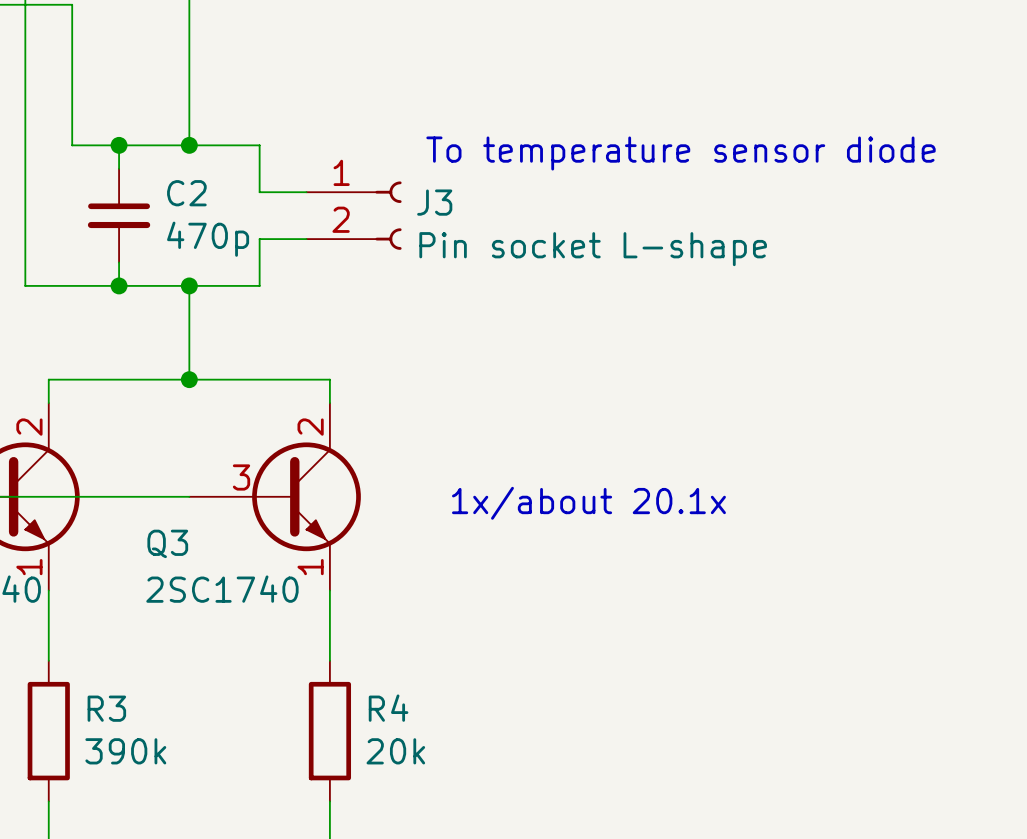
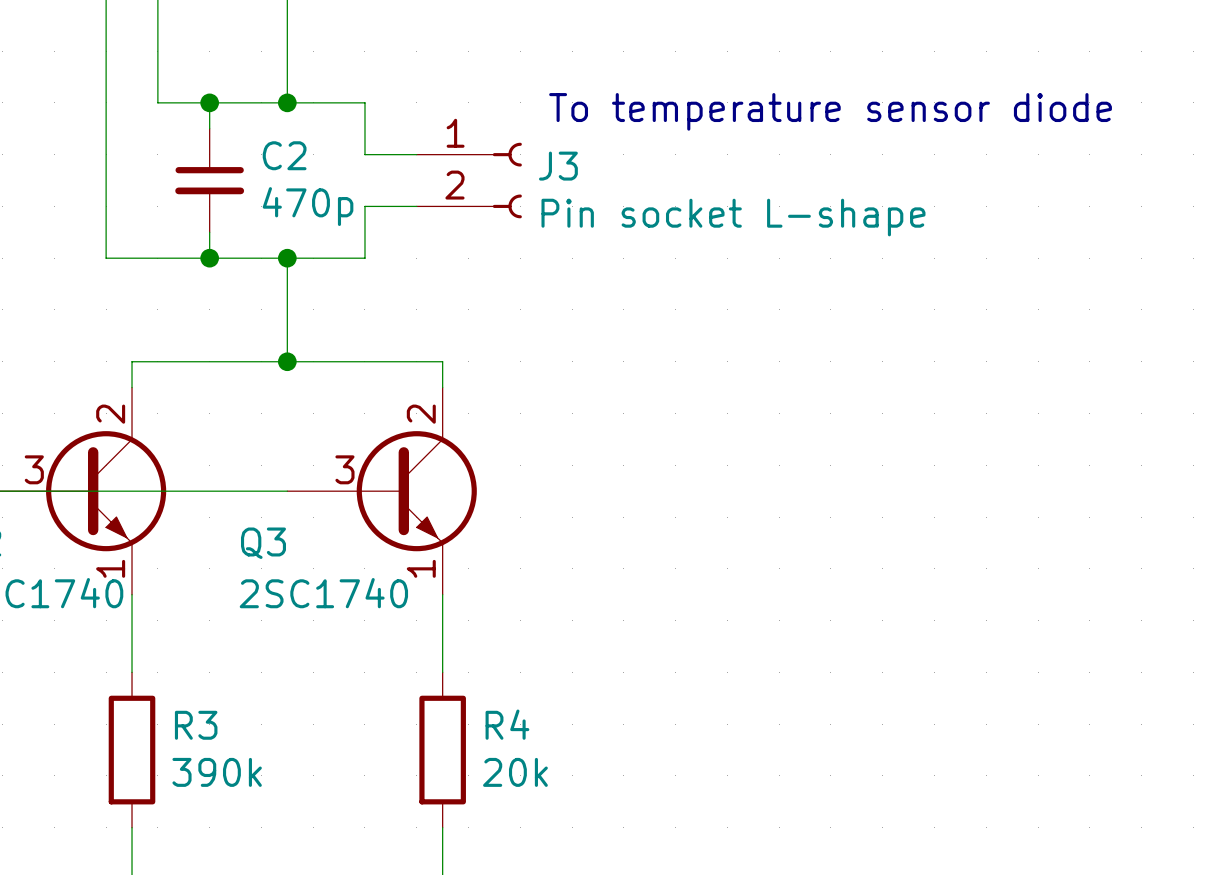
text: 1x/about 20.1x (588, 503) -> none

